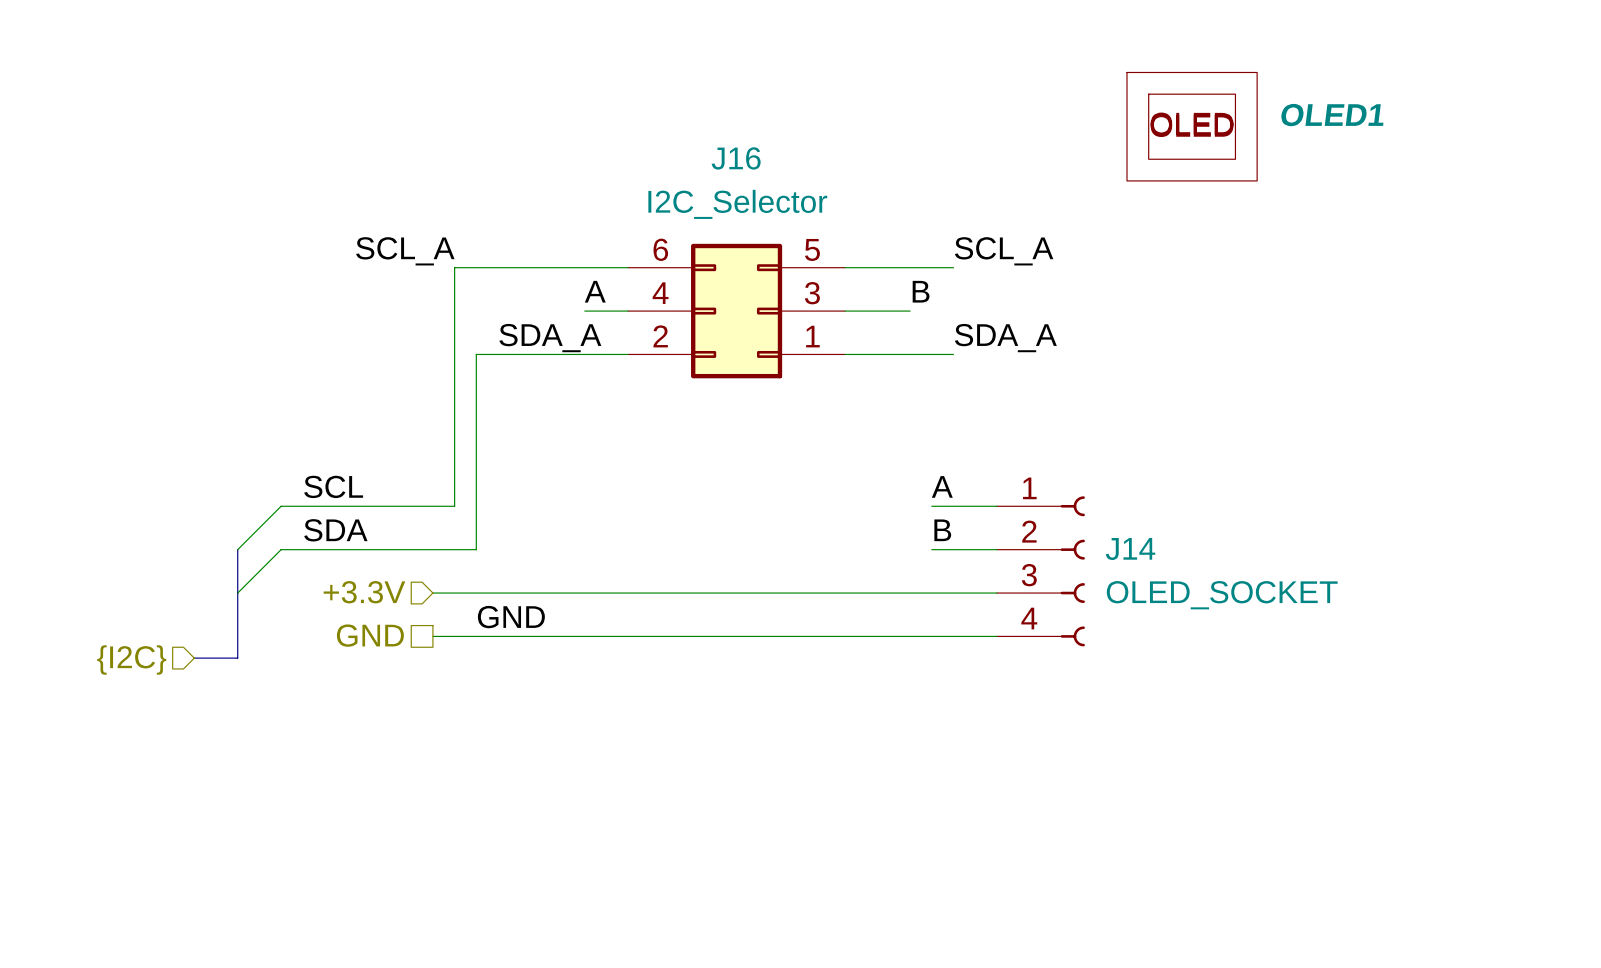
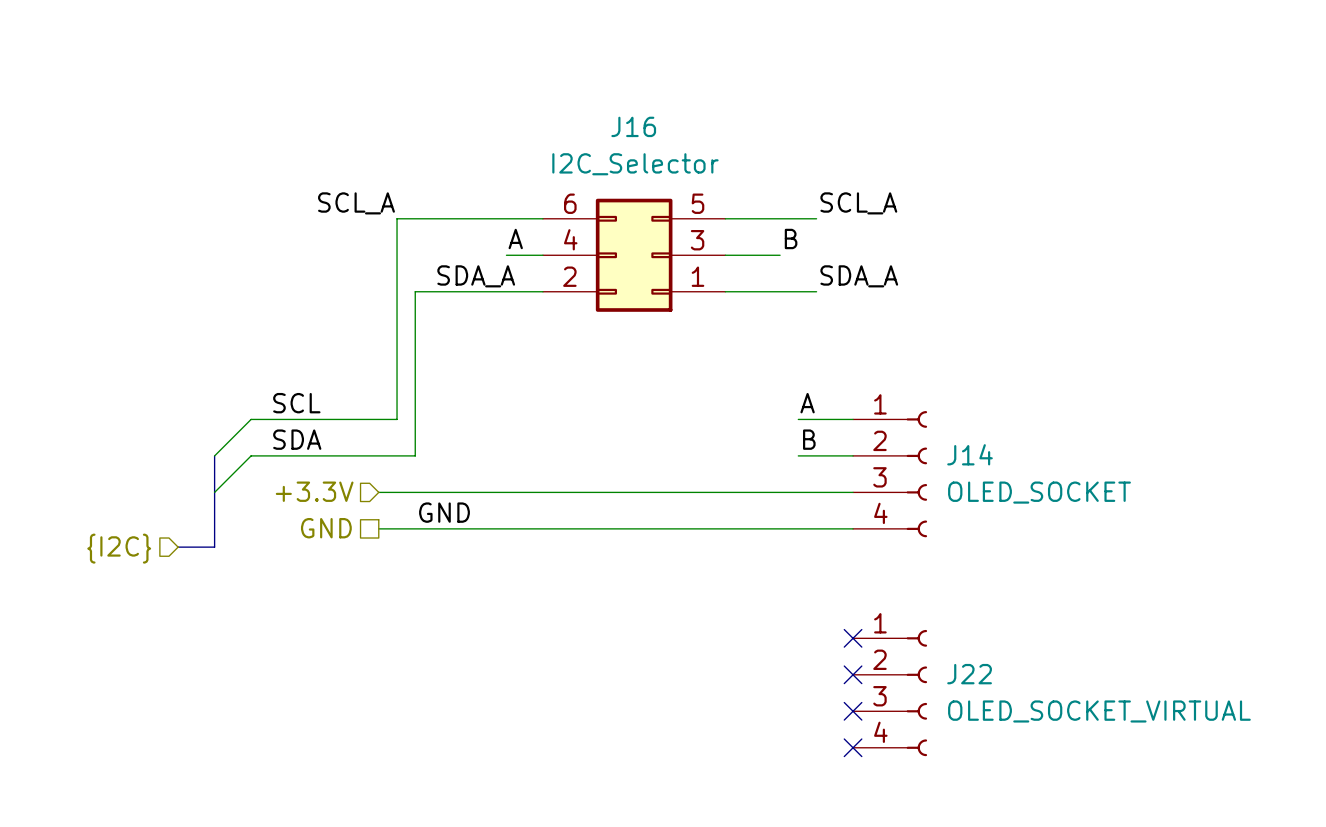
OLED1: (1192, 126) -> none
no-connect mark: none -> (853, 638)
no-connect mark: none -> (853, 674)
J22: none -> OLED_SOCKET_VIRTUAL (890, 693)
no-connect mark: none -> (853, 711)
no-connect mark: none -> (853, 747)

